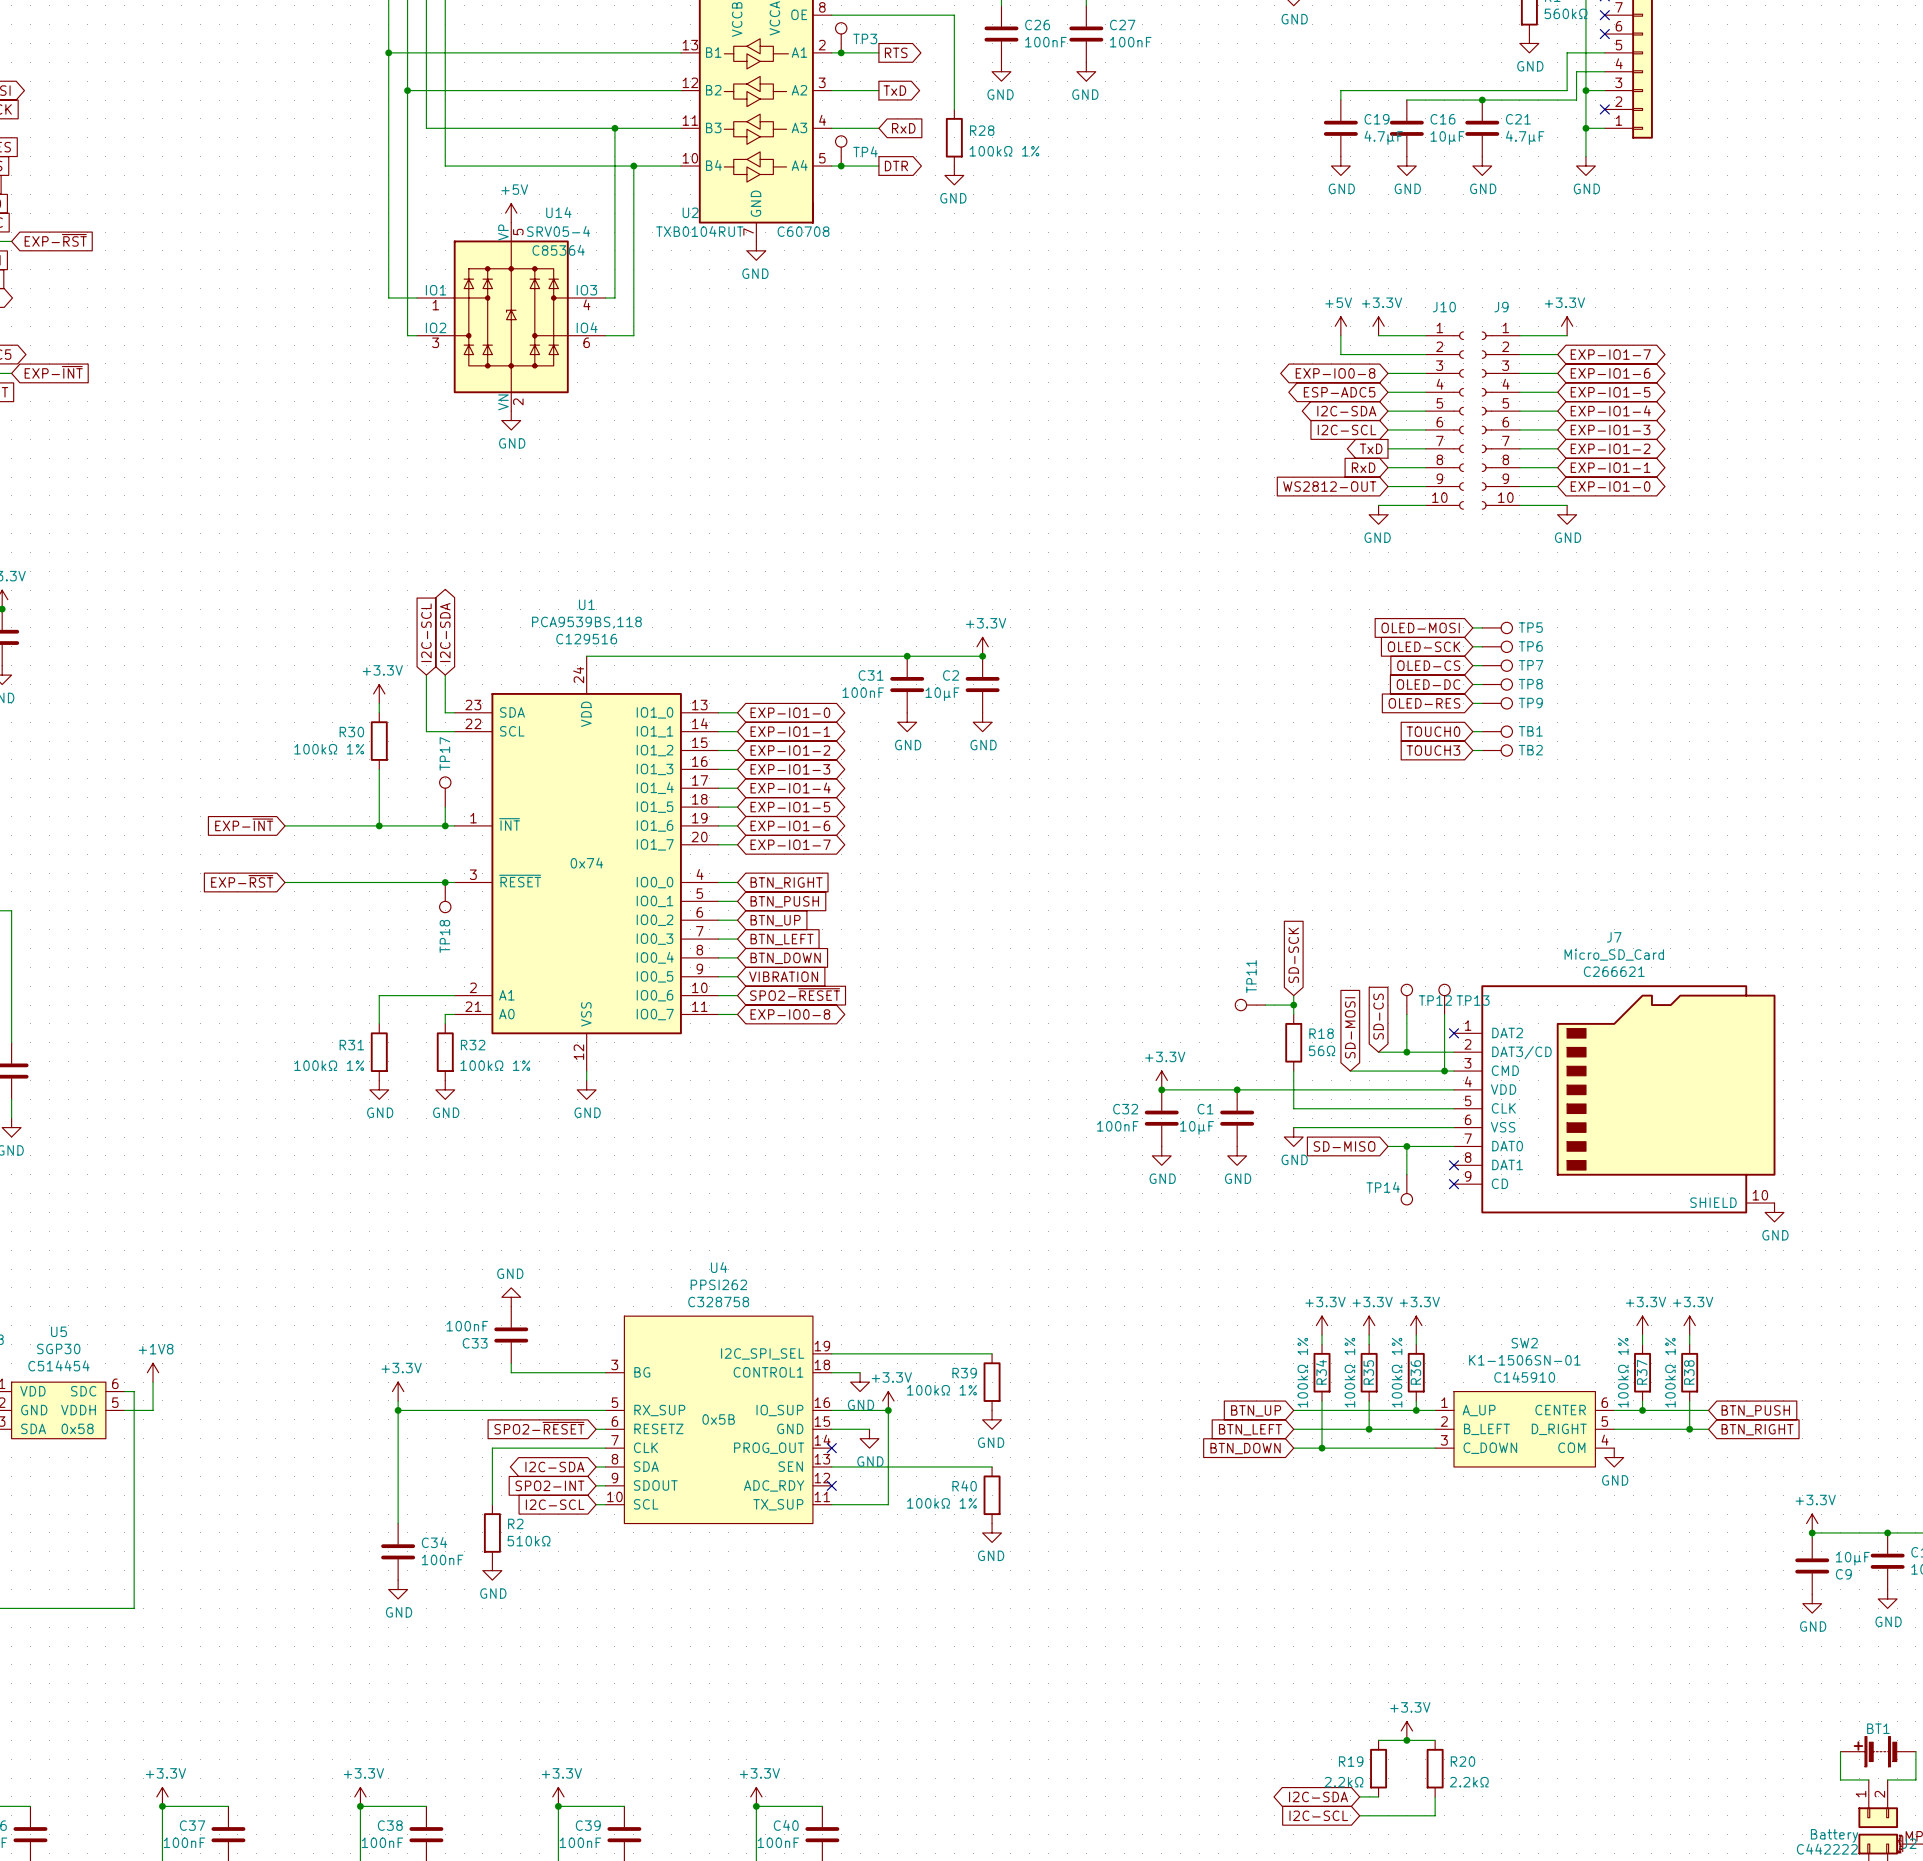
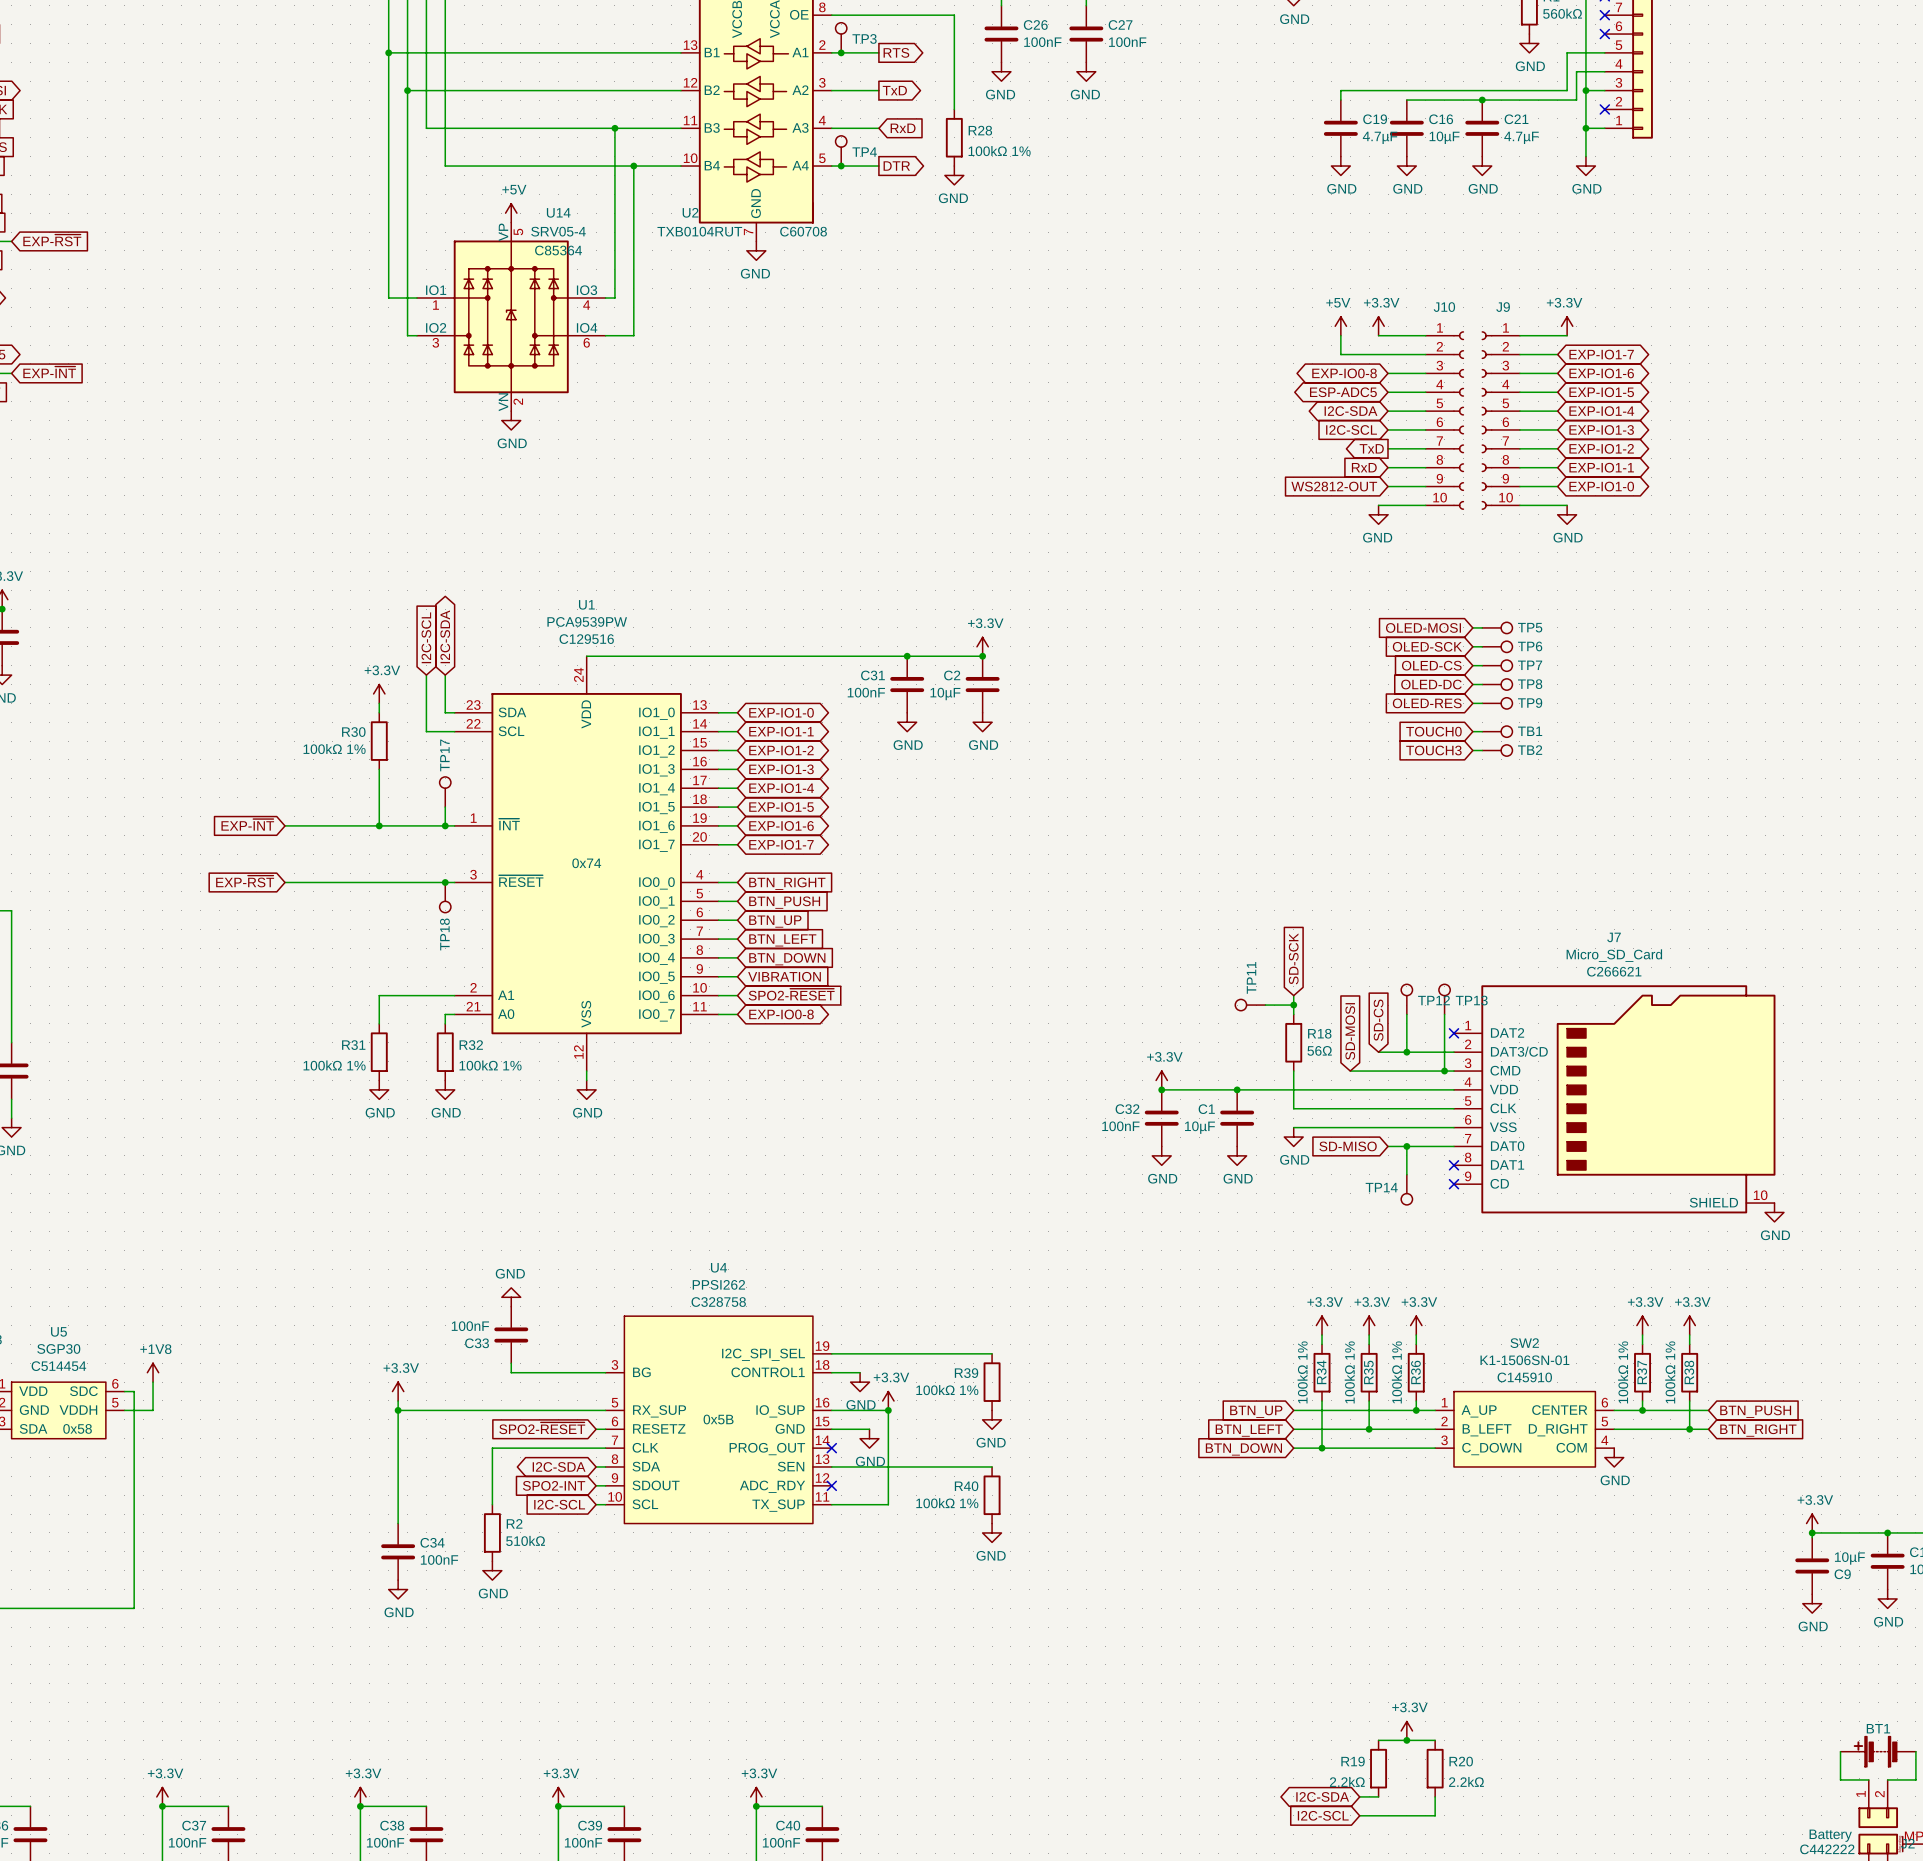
U1 value: PCA9539BS,118 (586, 622) -> PCA9539PW (587, 621)

